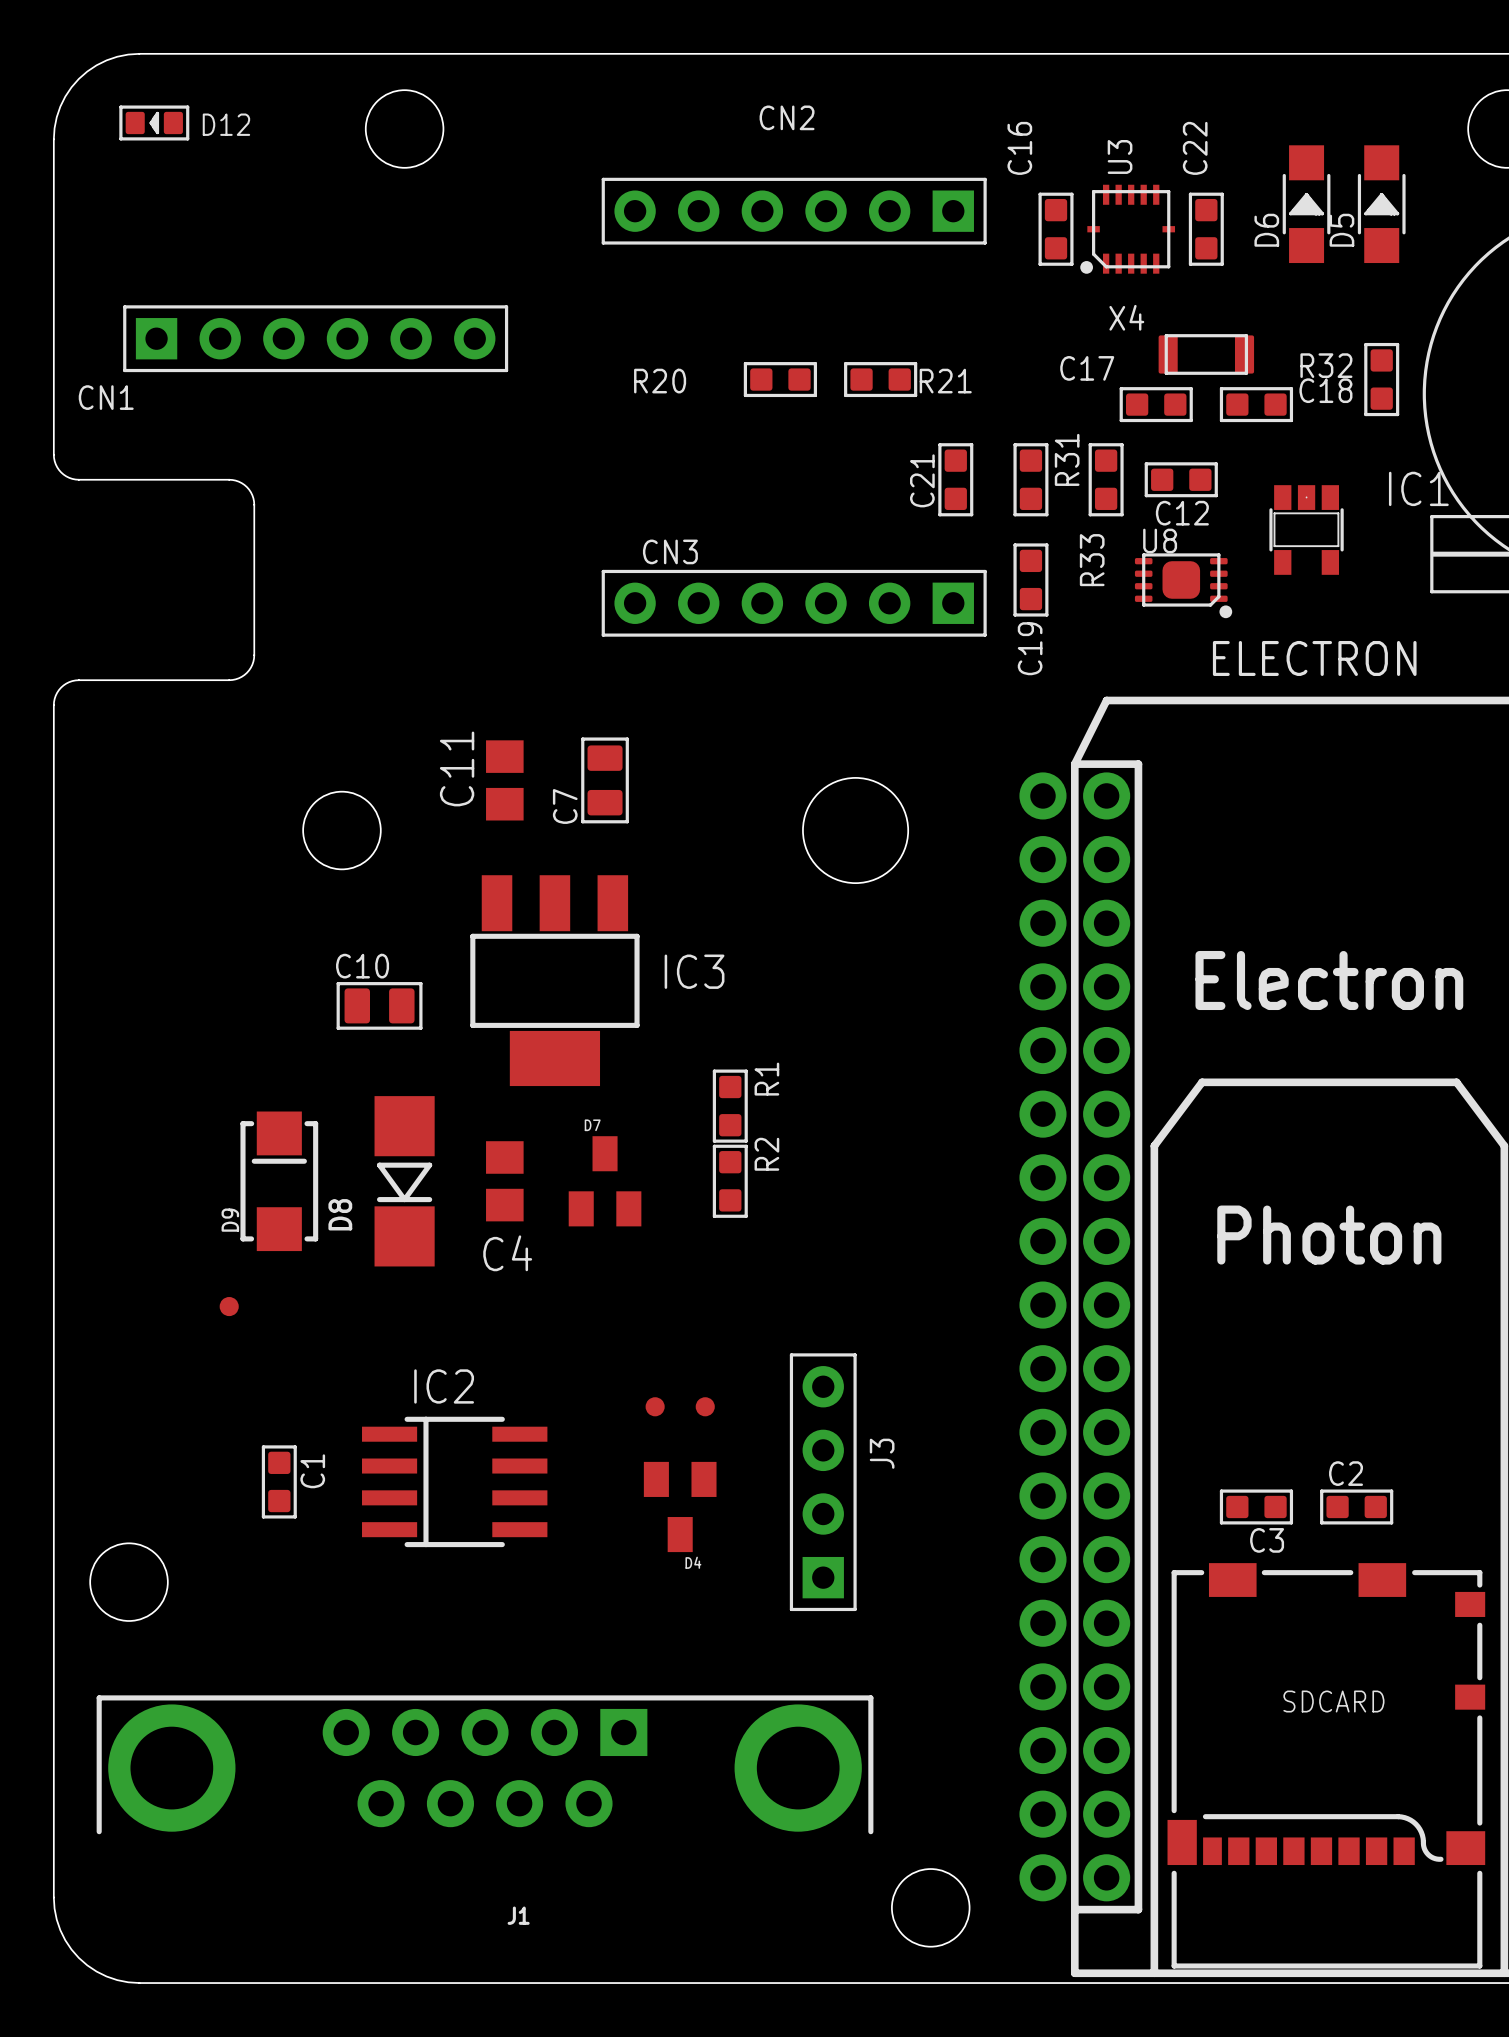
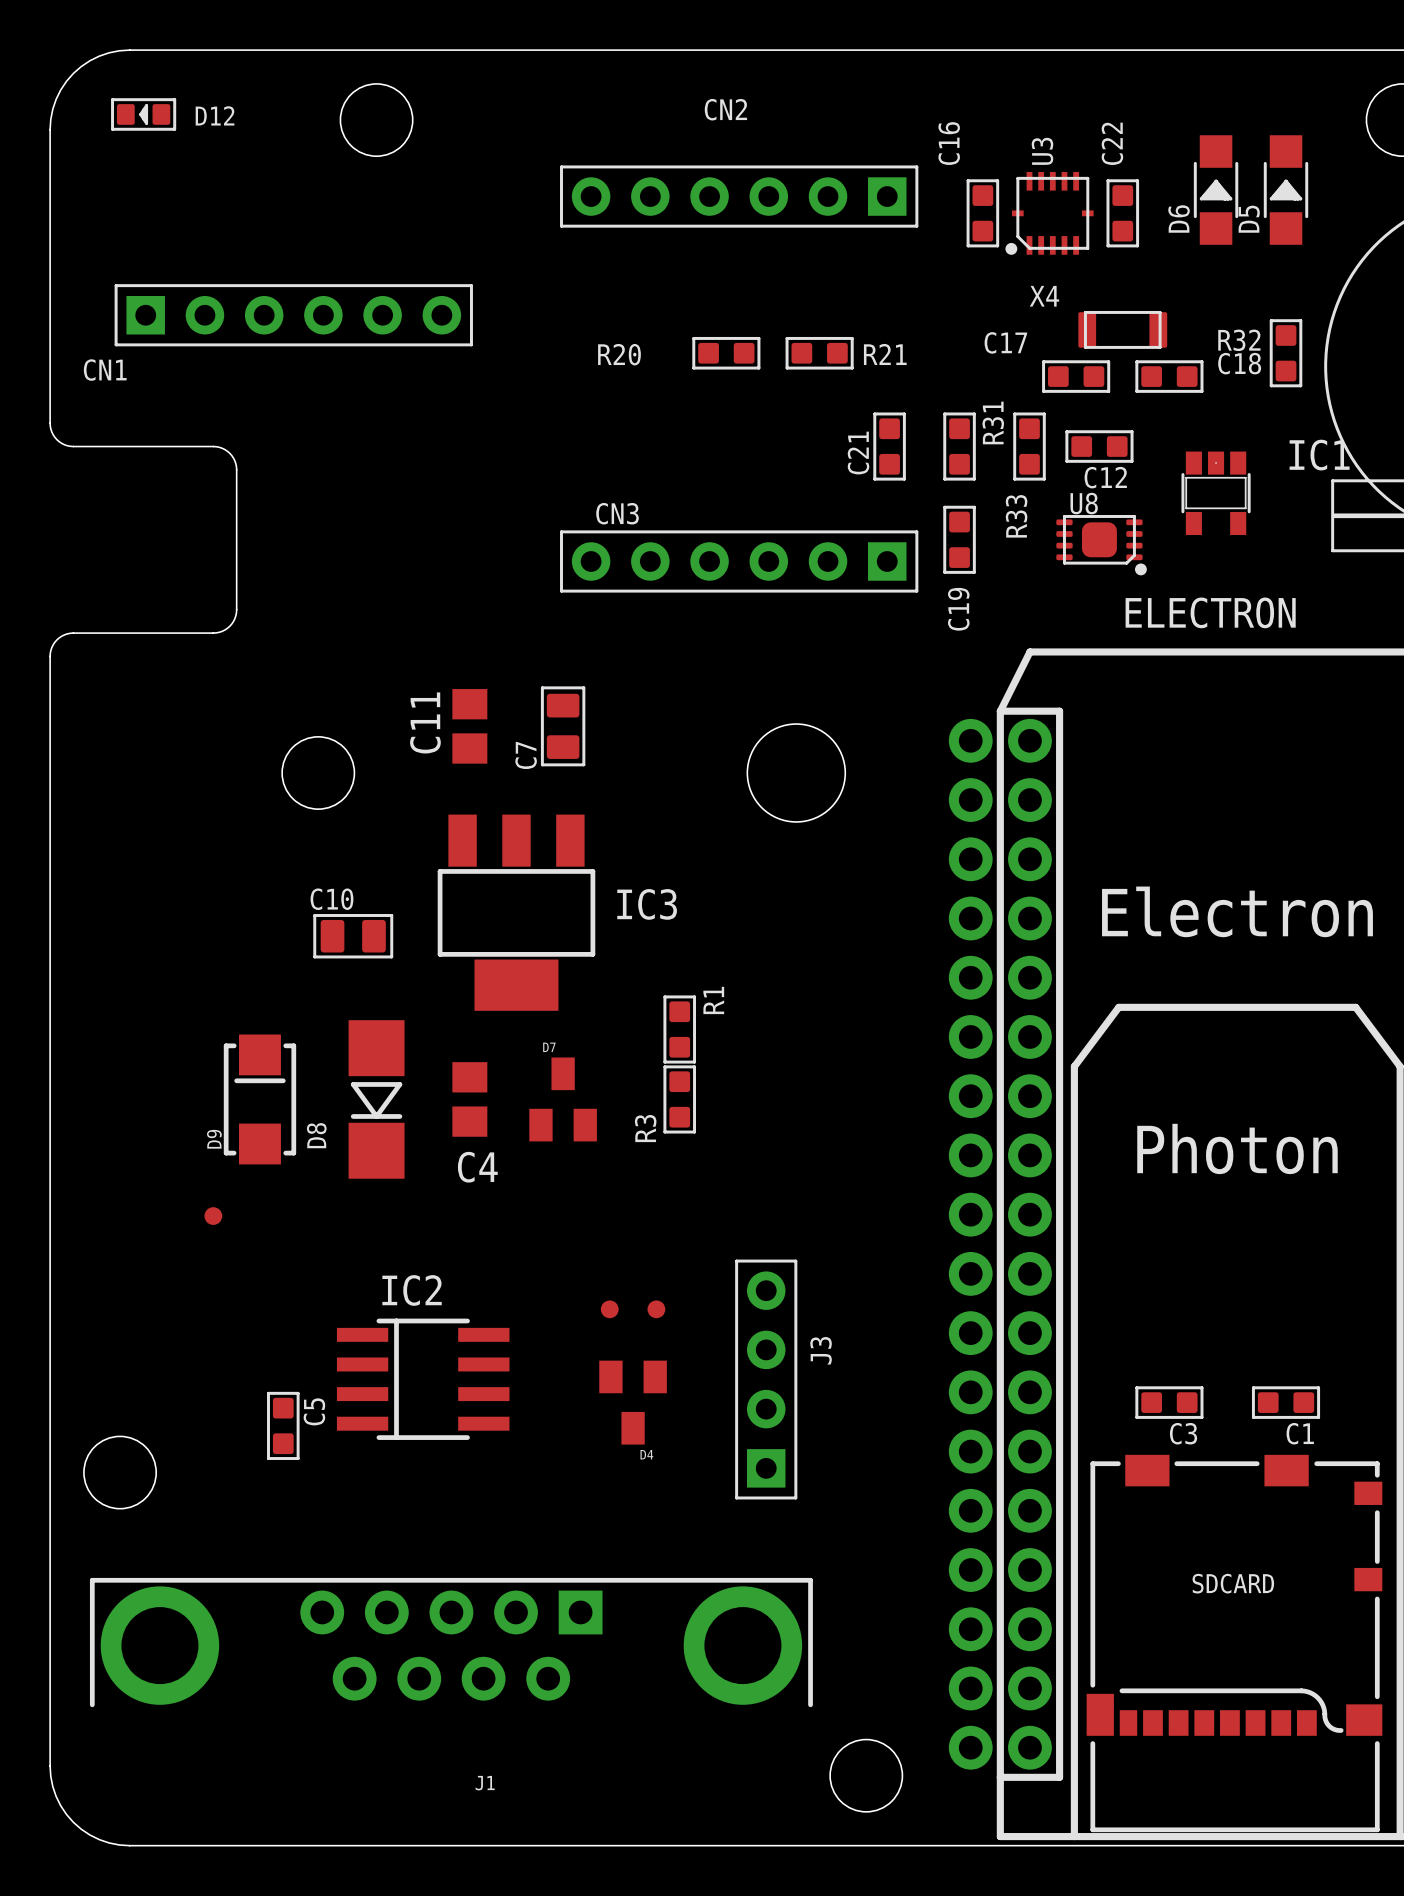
R2 name: R2 (766, 1154) -> R3 (645, 1128)
C1 rotation: 0° (279, 1481) -> 90° clockwise (1286, 1402)
C1 position: (279, 1481) -> (1286, 1402)
C2: (1356, 1506) -> none
C5: none -> (283, 1425)

